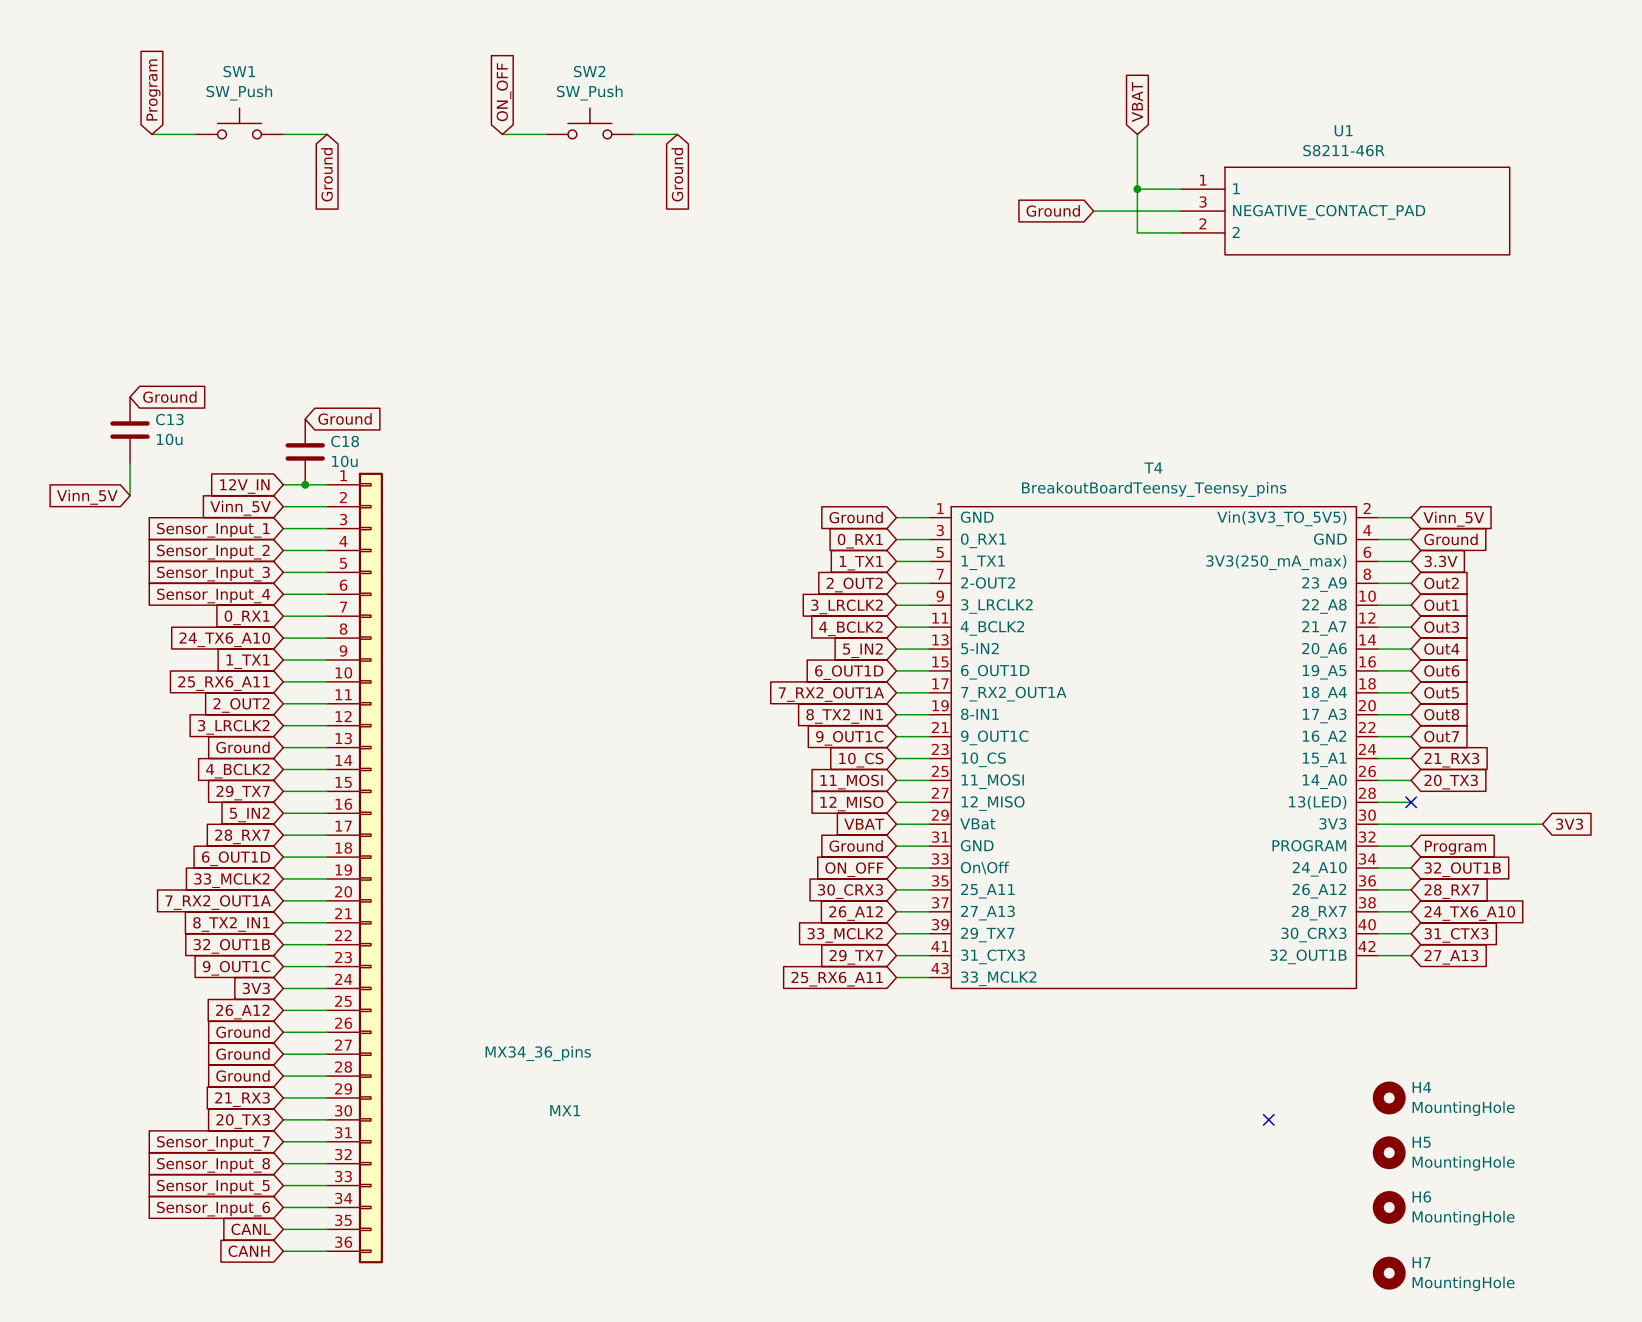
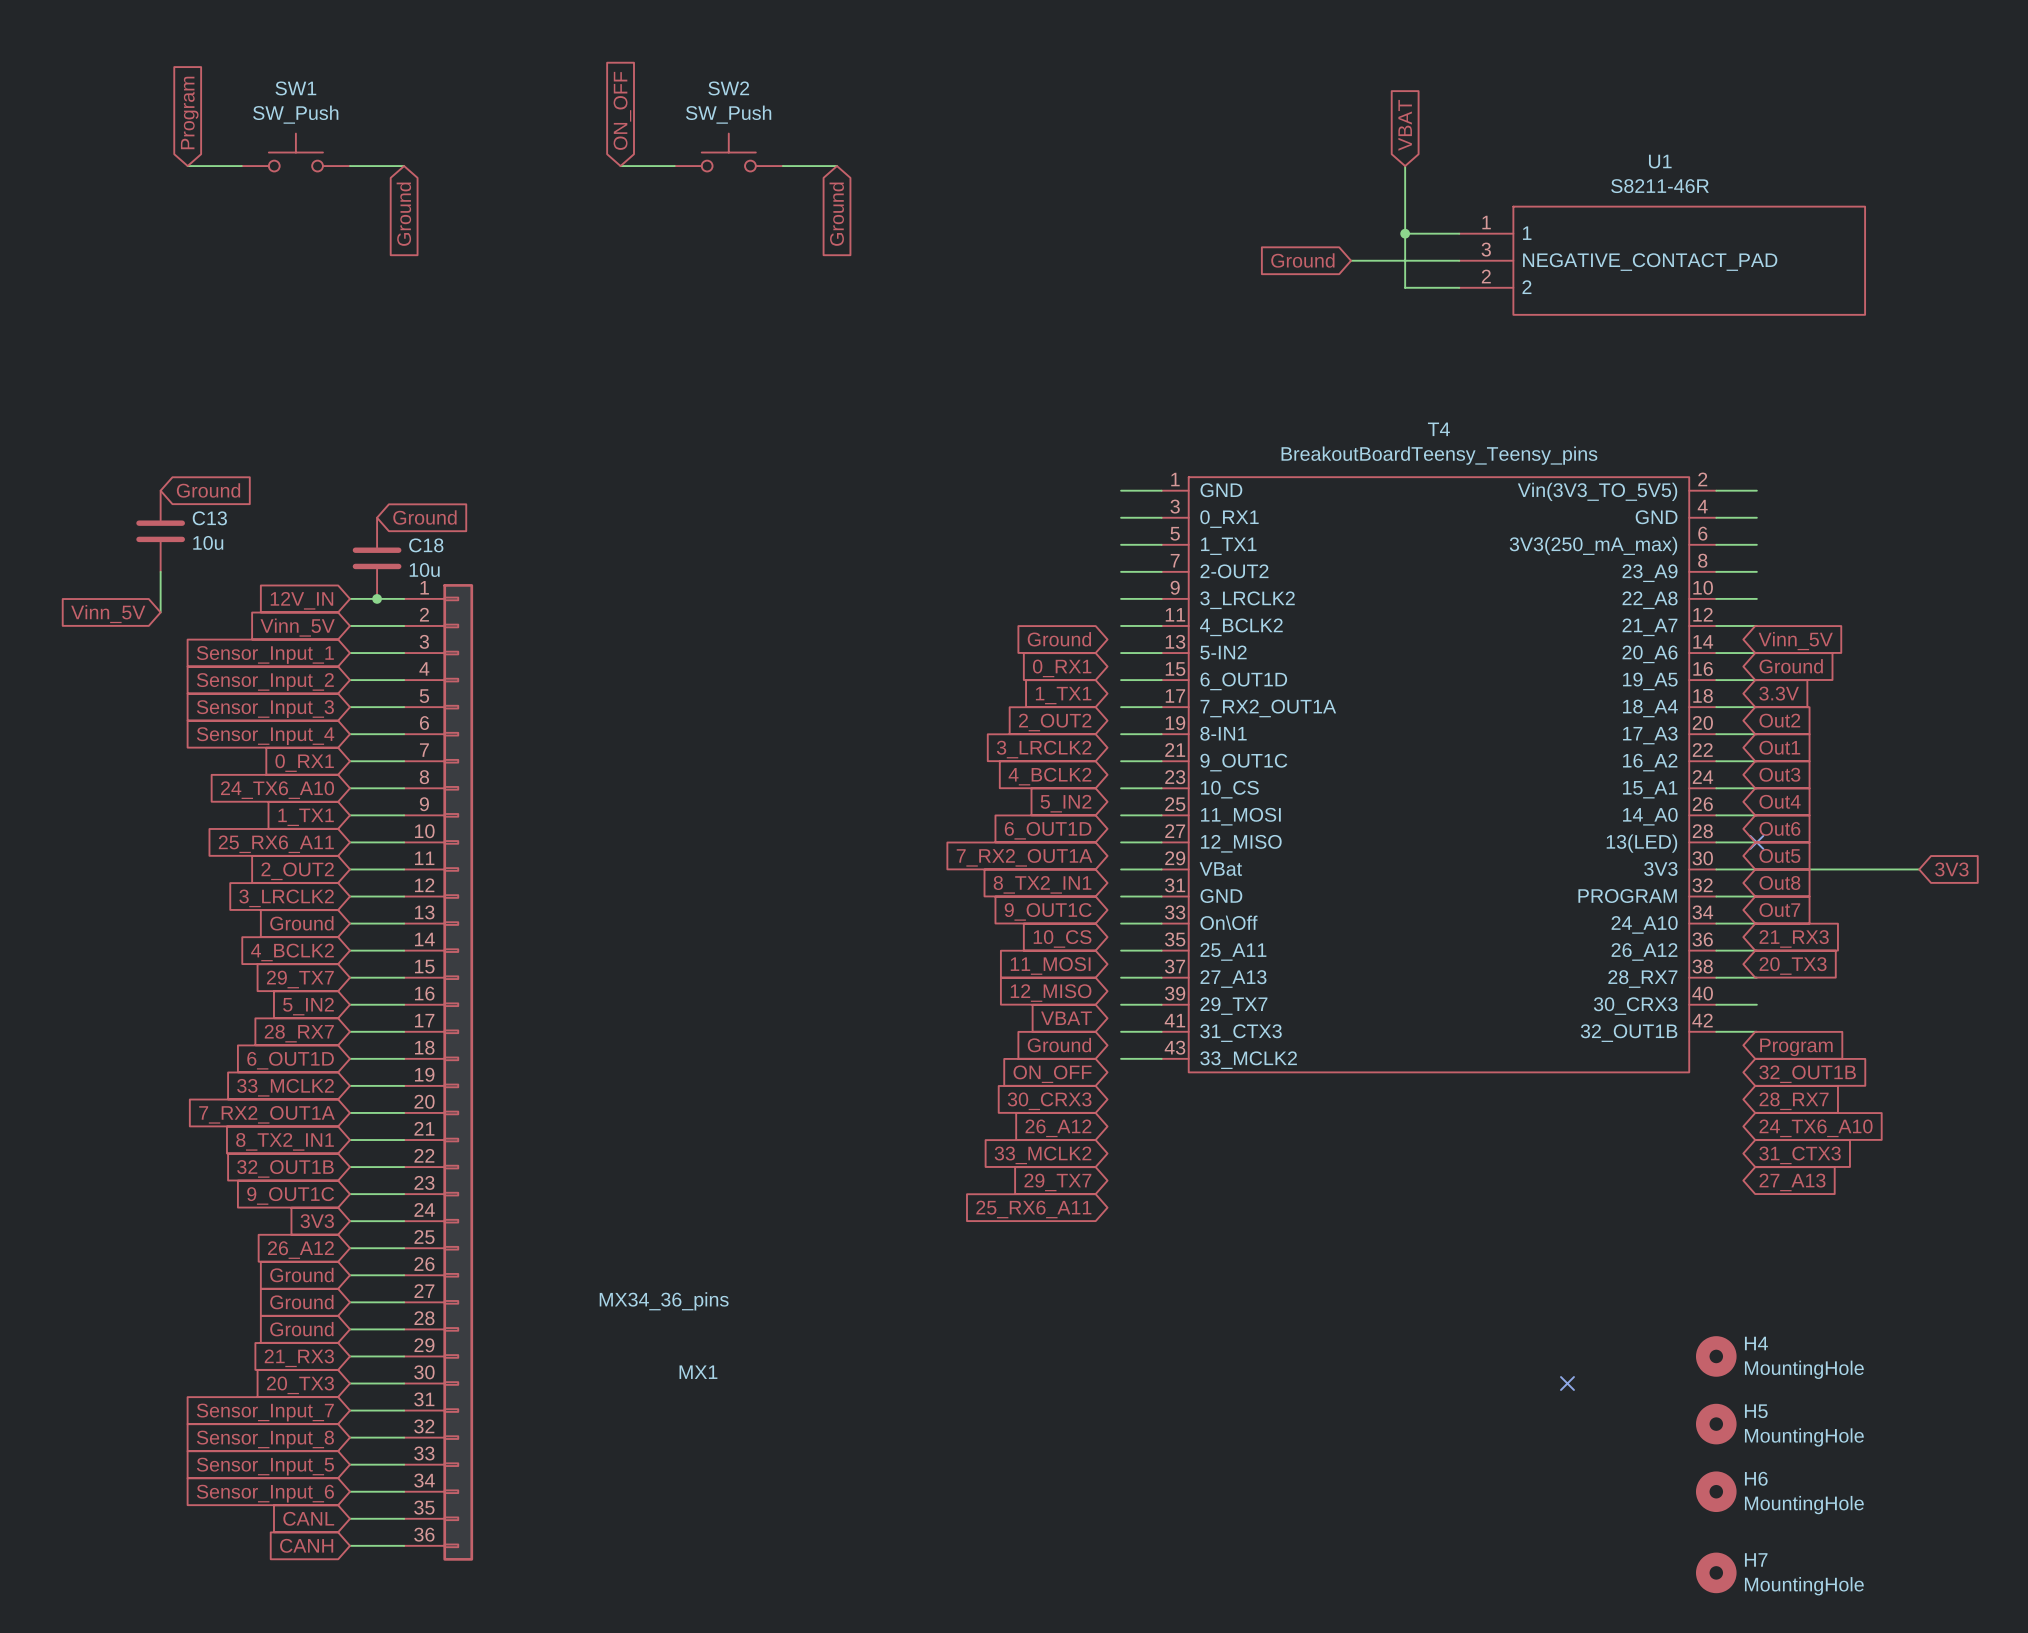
wire: (896, 517) (929, 517) -> (1121, 490) (1161, 490)
wire: (1378, 517) (1411, 517) -> (1716, 490) (1756, 490)
wire: (896, 539) (929, 539) -> (1121, 517) (1161, 517)
wire: (1378, 539) (1411, 539) -> (1716, 517) (1756, 517)
wire: (896, 561) (929, 561) -> (1121, 544) (1161, 544)
wire: (1378, 561) (1411, 561) -> (1716, 544) (1756, 544)
wire: (896, 583) (929, 583) -> (1121, 571) (1161, 571)
wire: (1378, 583) (1411, 583) -> (1716, 571) (1756, 571)
wire: (896, 605) (929, 605) -> (1121, 598) (1161, 598)
wire: (1378, 605) (1411, 605) -> (1716, 598) (1756, 598)
wire: (896, 627) (929, 627) -> (1121, 625) (1161, 625)
wire: (1378, 627) (1411, 627) -> (1716, 625) (1756, 625)
wire: (896, 649) (929, 649) -> (1121, 653) (1161, 653)
wire: (1378, 649) (1411, 649) -> (1716, 653) (1756, 653)
wire: (896, 670) (929, 670) -> (1121, 680) (1161, 680)
wire: (1378, 670) (1411, 670) -> (1716, 680) (1756, 680)
no-connect mark: none -> (1756, 842)
wire: (896, 692) (929, 692) -> (1121, 707) (1161, 707)
wire: (1378, 692) (1411, 692) -> (1716, 707) (1756, 707)
wire: (896, 714) (929, 714) -> (1121, 734) (1161, 734)
wire: (1378, 714) (1411, 714) -> (1716, 734) (1756, 734)
wire: (896, 736) (929, 736) -> (1121, 761) (1161, 761)
wire: (1378, 736) (1411, 736) -> (1716, 761) (1756, 761)
T4 position: (1153, 747) -> (1438, 774)
wire: (896, 758) (929, 758) -> (1121, 788) (1161, 788)
wire: (1378, 758) (1411, 758) -> (1716, 788) (1756, 788)
wire: (896, 780) (929, 780) -> (1121, 815) (1161, 815)
wire: (1378, 780) (1411, 780) -> (1716, 815) (1756, 815)
wire: (896, 802) (929, 802) -> (1121, 842) (1161, 842)
wire: (1378, 802) (1411, 802) -> (1716, 842) (1756, 842)
no-connect mark: (1411, 802) -> none
wire: (896, 824) (929, 824) -> (1121, 869) (1161, 869)
wire: (1378, 824) (1542, 824) -> (1716, 869) (1919, 869)
global label position: 3V3 (1569, 824) -> 3V3 (1951, 869)
wire: (896, 846) (929, 846) -> (1121, 896) (1161, 896)
wire: (1378, 846) (1411, 846) -> (1716, 896) (1756, 896)
wire: (896, 868) (929, 868) -> (1121, 923) (1161, 923)
wire: (1378, 868) (1411, 868) -> (1716, 923) (1756, 923)
wire: (896, 889) (929, 889) -> (1121, 950) (1161, 950)
wire: (1378, 889) (1411, 889) -> (1716, 950) (1756, 950)
wire: (896, 911) (929, 911) -> (1121, 977) (1161, 977)
wire: (1378, 911) (1411, 911) -> (1716, 977) (1756, 977)
wire: (896, 933) (929, 933) -> (1121, 1004) (1161, 1004)
wire: (1378, 933) (1411, 933) -> (1716, 1004) (1756, 1004)
wire: (896, 955) (929, 955) -> (1121, 1031) (1161, 1031)
wire: (1378, 955) (1411, 955) -> (1716, 1031) (1756, 1031)
wire: (896, 977) (929, 977) -> (1121, 1058) (1161, 1058)

